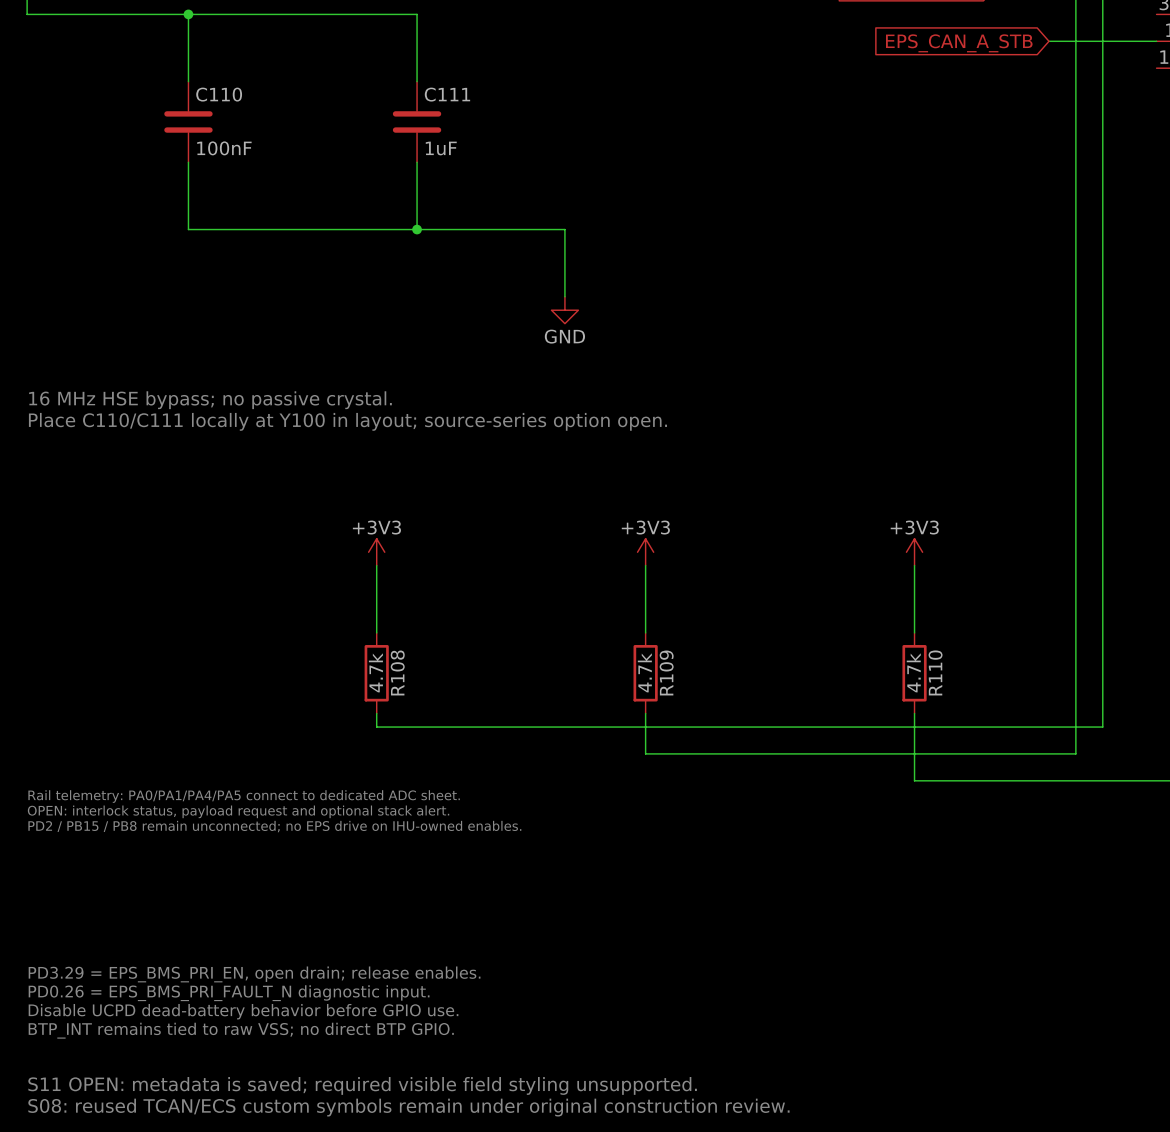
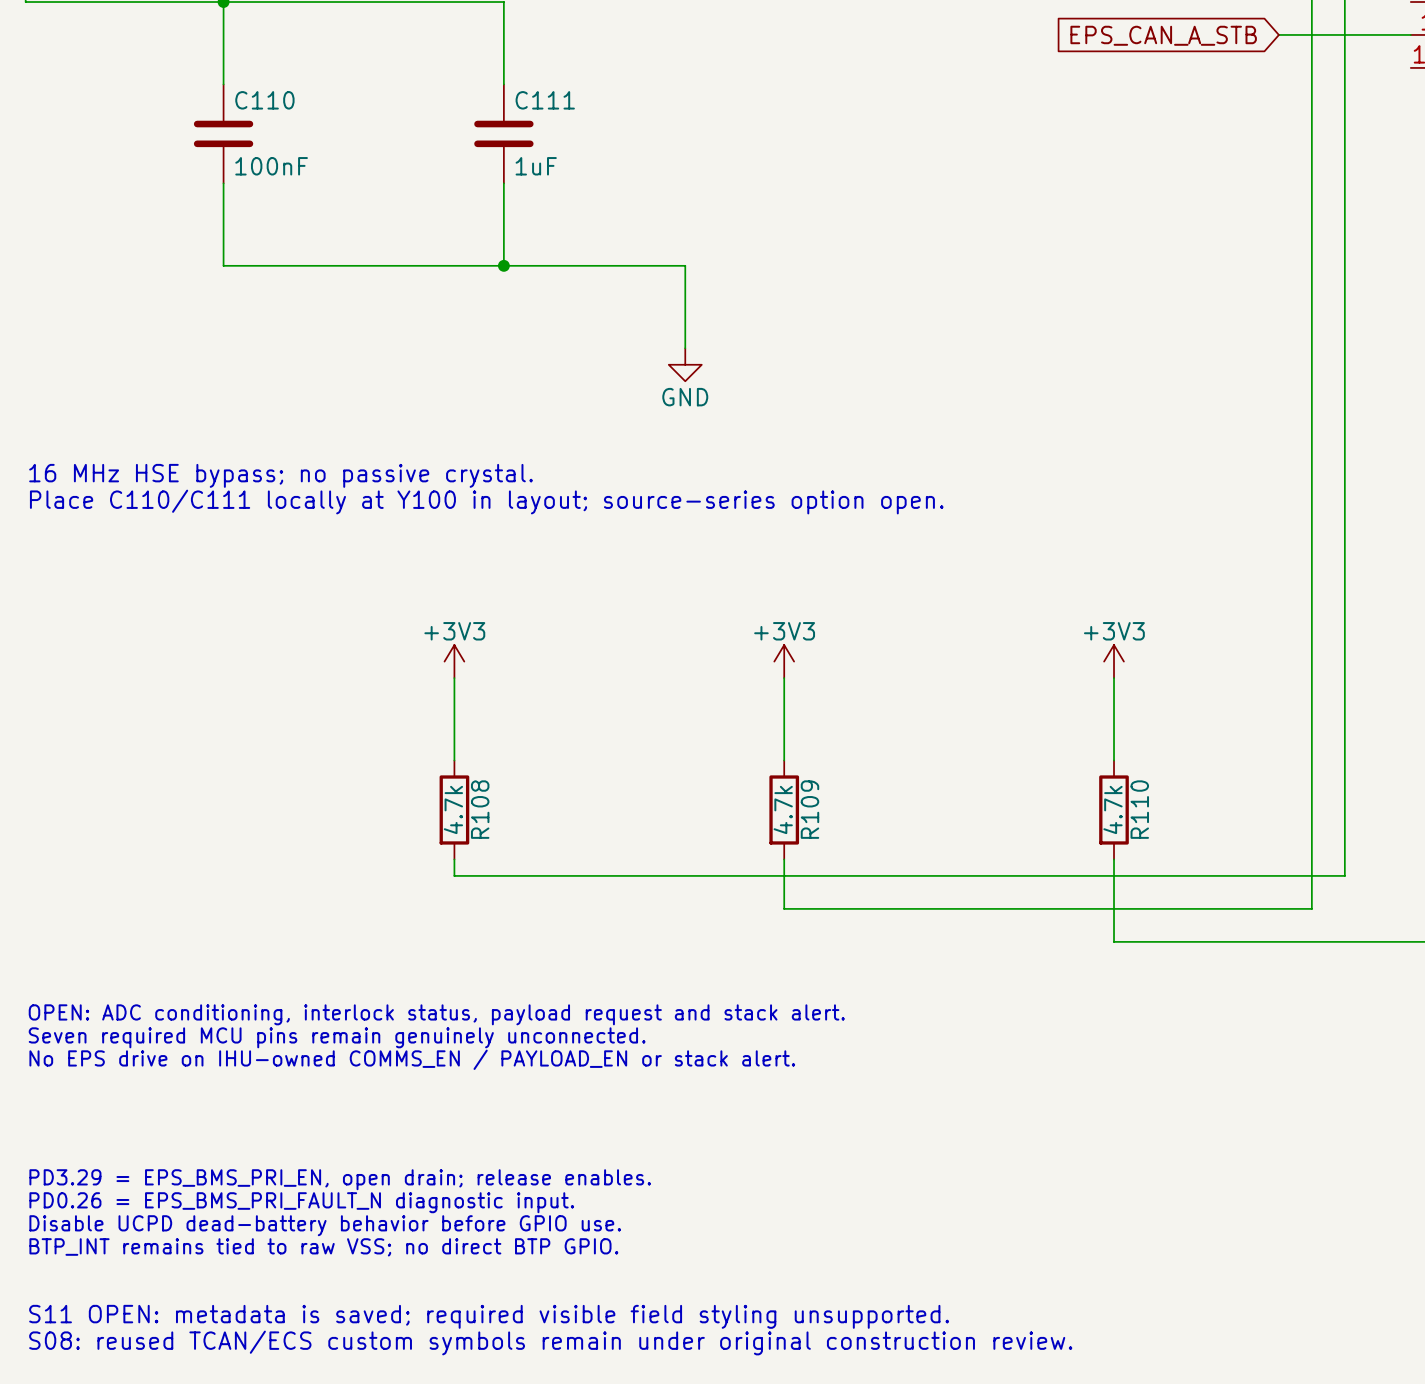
text: Rail telemetry: PA0/PA1/PA4/PA5 connect to dedicated ADC sheet. (244, 796) -> none
text: OPEN: interlock status, payload request and optional stack alert. (238, 811) -> none
text: PD2 / PB15 / PB8 remain unconnected; no EPS drive on IHU-owned enables. (274, 826) -> OPEN: ADC conditioning, interlock status, payload request and stack alert. (436, 1014)
text: none -> Seven required MCU pins remain genuinely unconnected. (337, 1037)
text: none -> No EPS drive on IHU-owned COMMS_EN / PAYLOAD_EN or stack alert. (412, 1059)

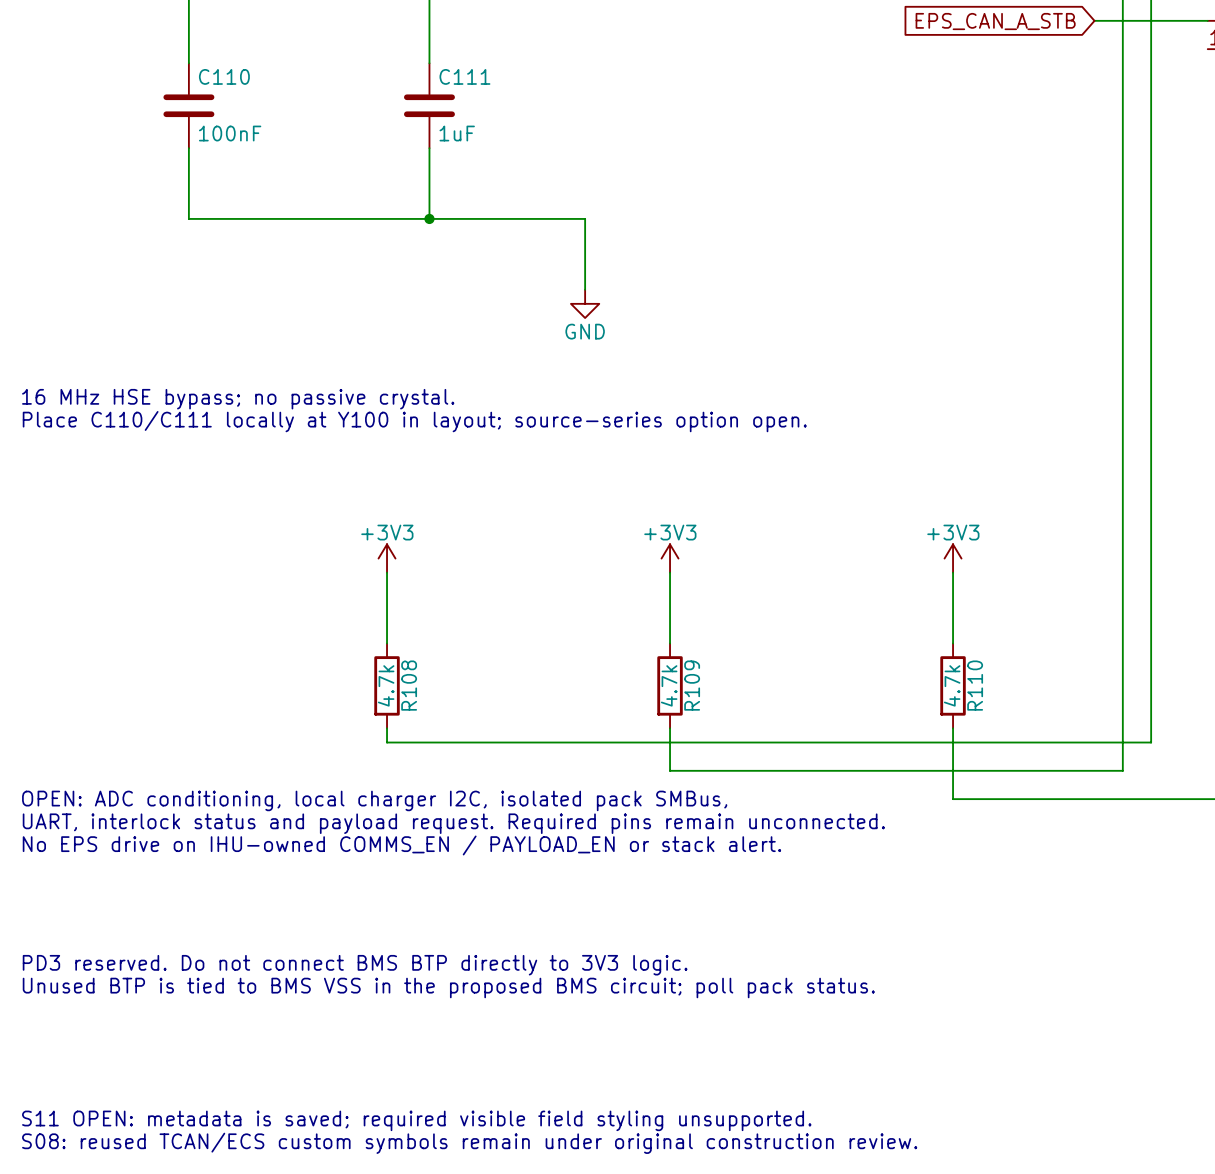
text: none -> OPEN: ADC conditioning, local charger I2C, isolated pack SMBus, (374, 800)
text: none -> UART, interlock status and payload request. Required pins remain unconnected. (453, 823)
text: OPEN: ADC conditioning, interlock status, payload request and stack alert. (436, 1014) -> No EPS drive on IHU-owned COMMS_EN / PAYLOAD_EN or stack alert. (401, 845)
text: Seven required MCU pins remain genuinely unconnected. (337, 1037) -> none
text: No EPS drive on IHU-owned COMMS_EN / PAYLOAD_EN or stack alert. (412, 1059) -> none
text: none -> PD3 reserved. Do not connect BMS BTP directly to 3V3 logic. (355, 965)
text: PD3.29 = EPS_BMS_PRI_EN, open drain; release enables. (340, 1179) -> Unused BTP is tied to BMS VSS in the proposed BMS circuit; poll pack status. (448, 987)
text: PD0.26 = EPS_BMS_PRI_FAULT_N diagnostic input. (301, 1202) -> none
text: Disable UCPD dead-battery behavior before GPIO use. (325, 1225) -> none
text: BTP_INT remains tied to raw VSS; no direct BTP GPIO. (323, 1247) -> none

